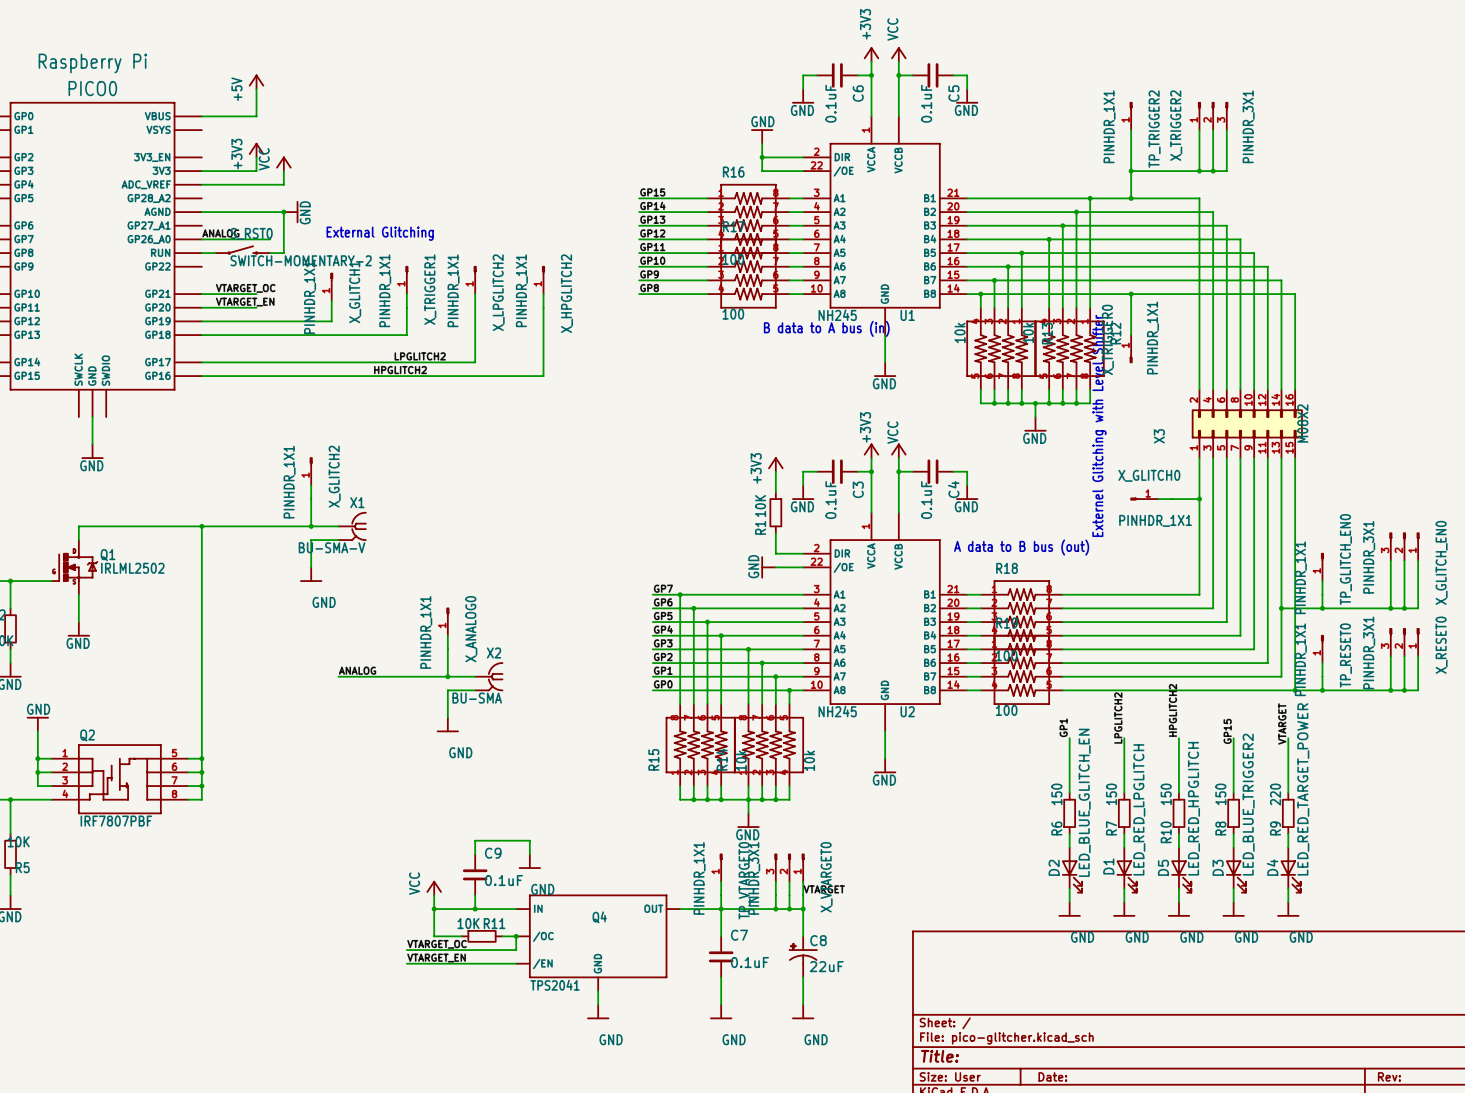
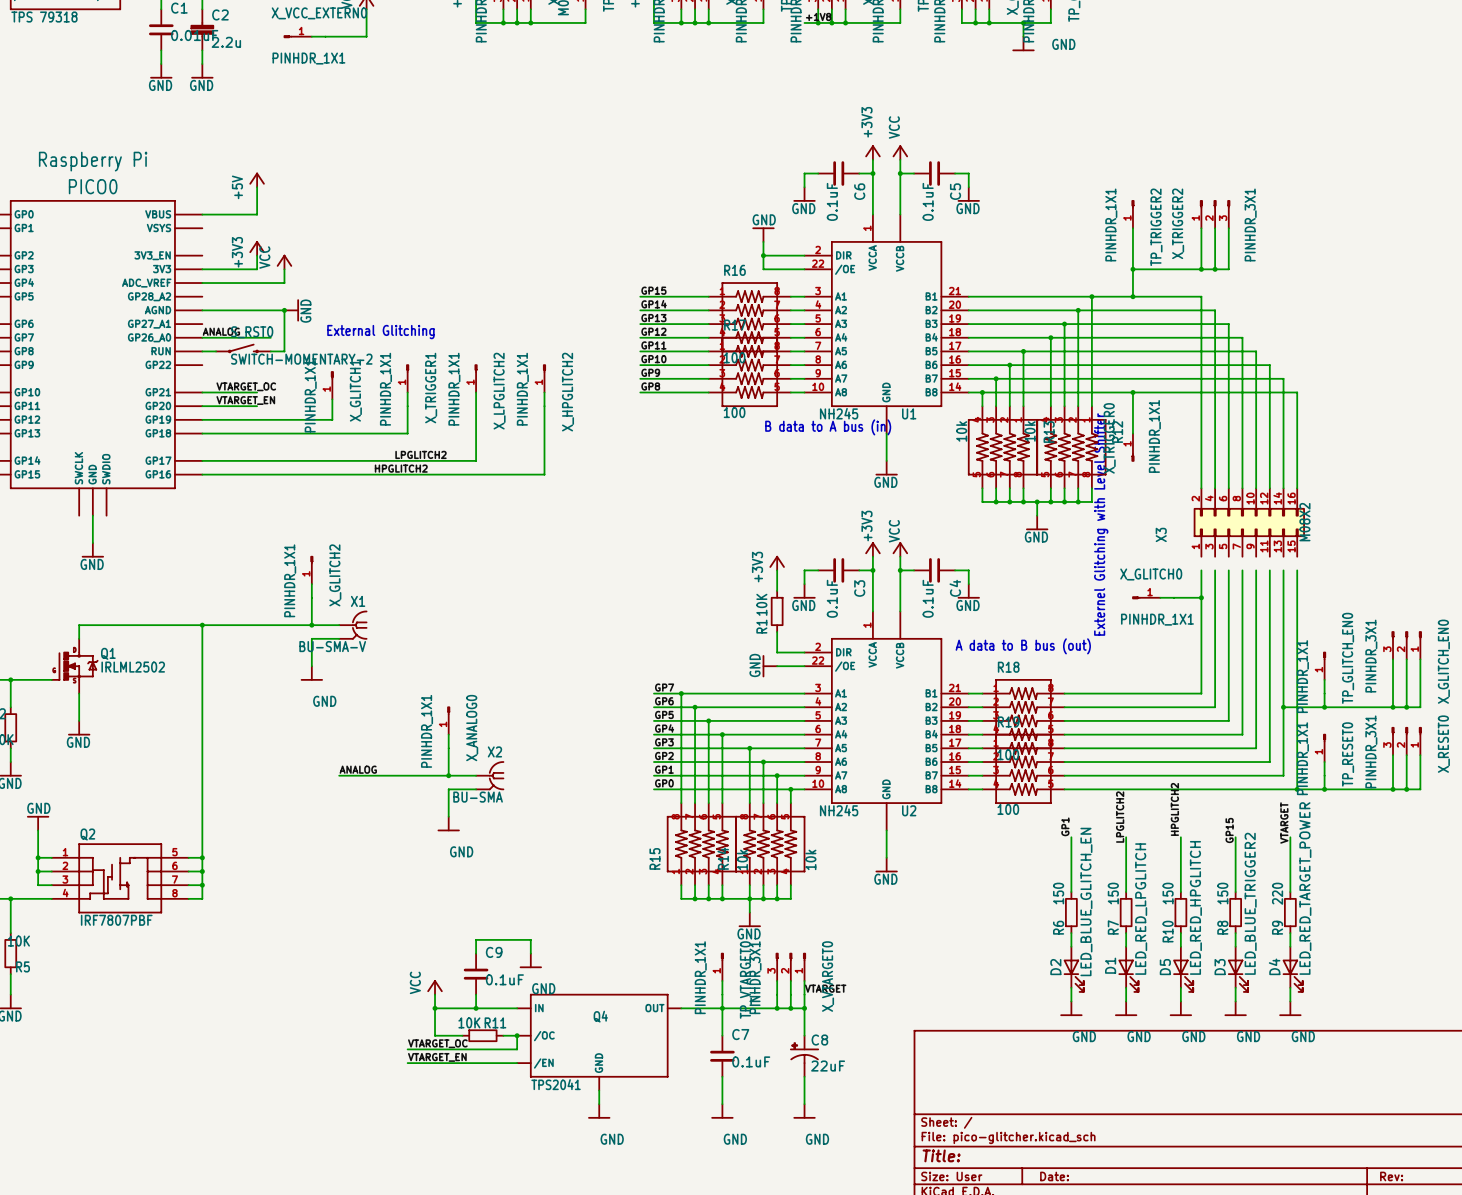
wire: (1199, 458) (1199, 471) -> none
wire: (1213, 458) (1213, 471) -> none
wire: (1226, 458) (1226, 471) -> none
wire: (1240, 458) (1240, 471) -> none
wire: (1254, 458) (1254, 471) -> none
wire: (1267, 458) (1267, 471) -> none
wire: (1281, 458) (1281, 471) -> none
wire: (1295, 458) (1295, 471) -> none

